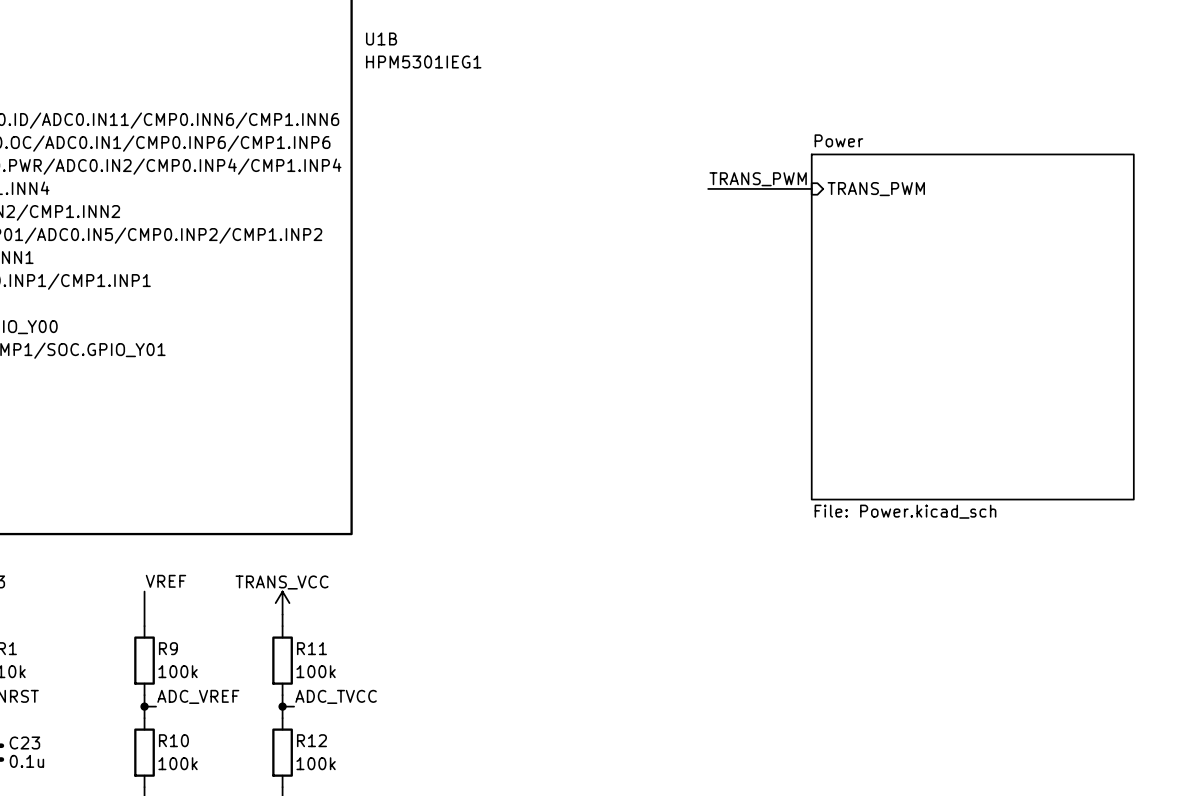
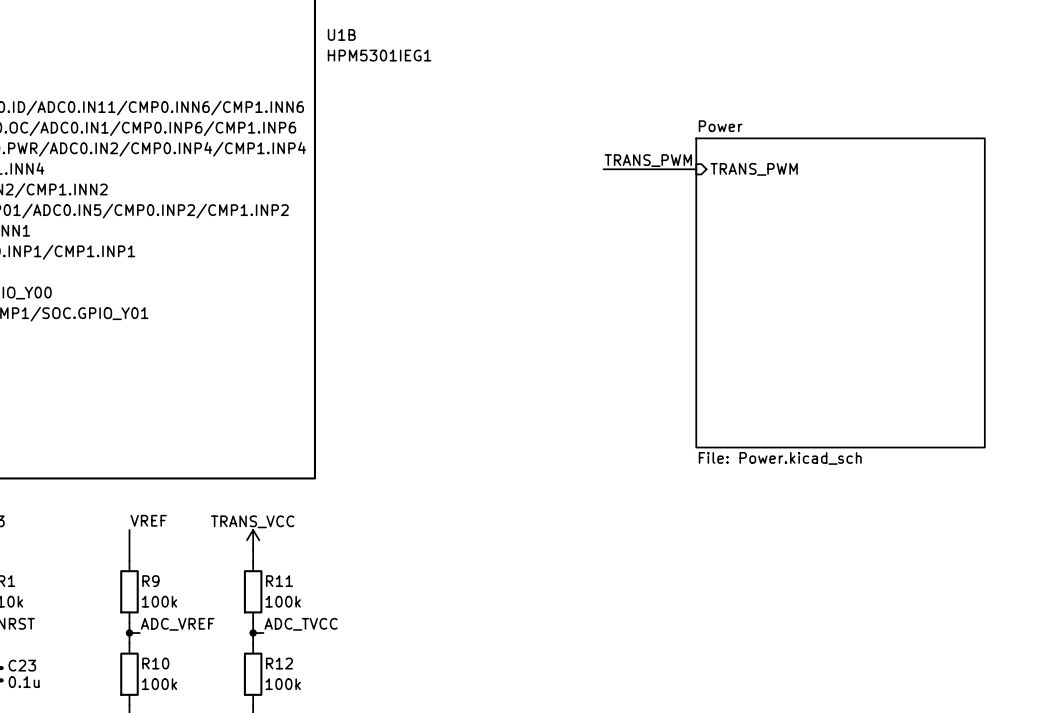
label position: TRANS_PWM (758, 179) -> TRANS_PWM (648, 160)
wire: (777, 188) (811, 188) -> (603, 169) (634, 169)
sheet pin position: TRANS_PWM (876, 189) -> TRANS_PWM (754, 169)
sheet Power position: (972, 327) -> (840, 292)

